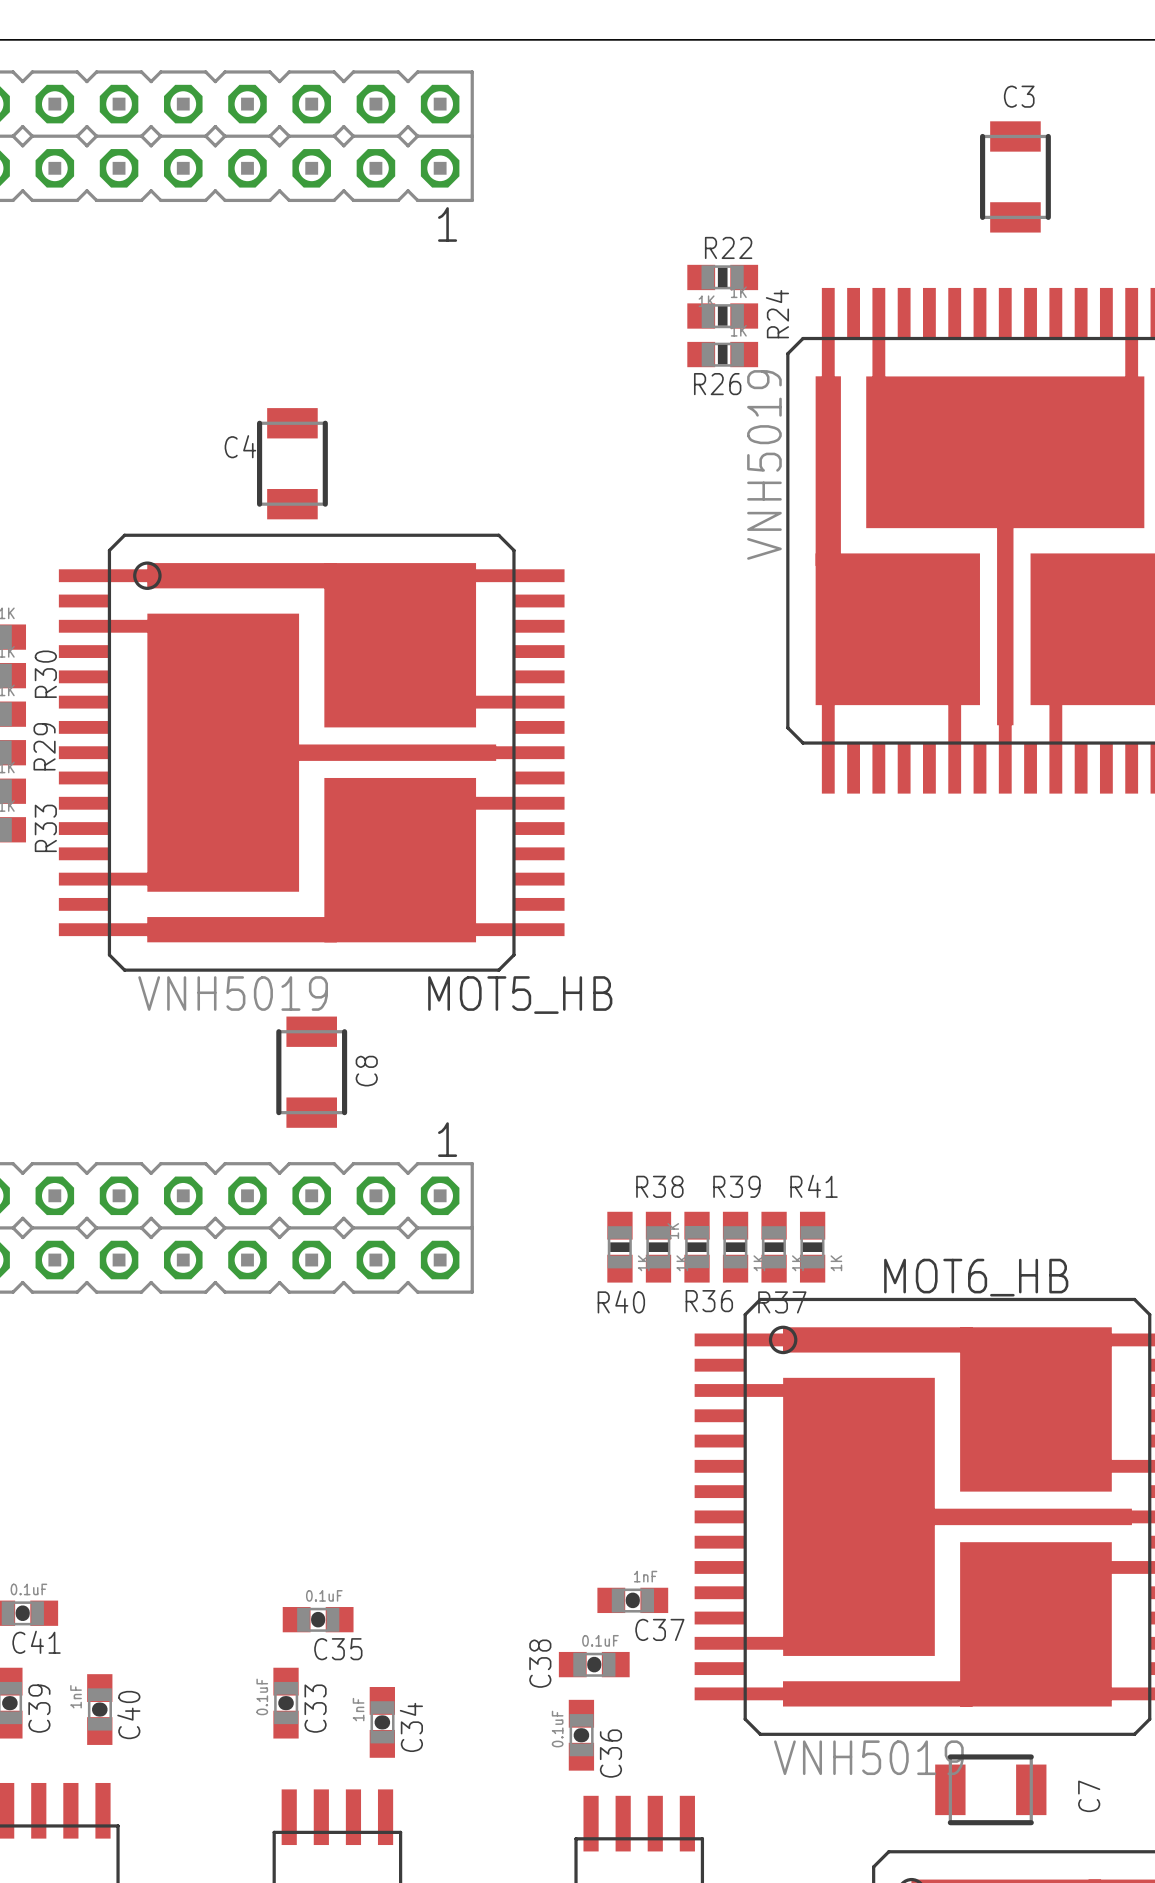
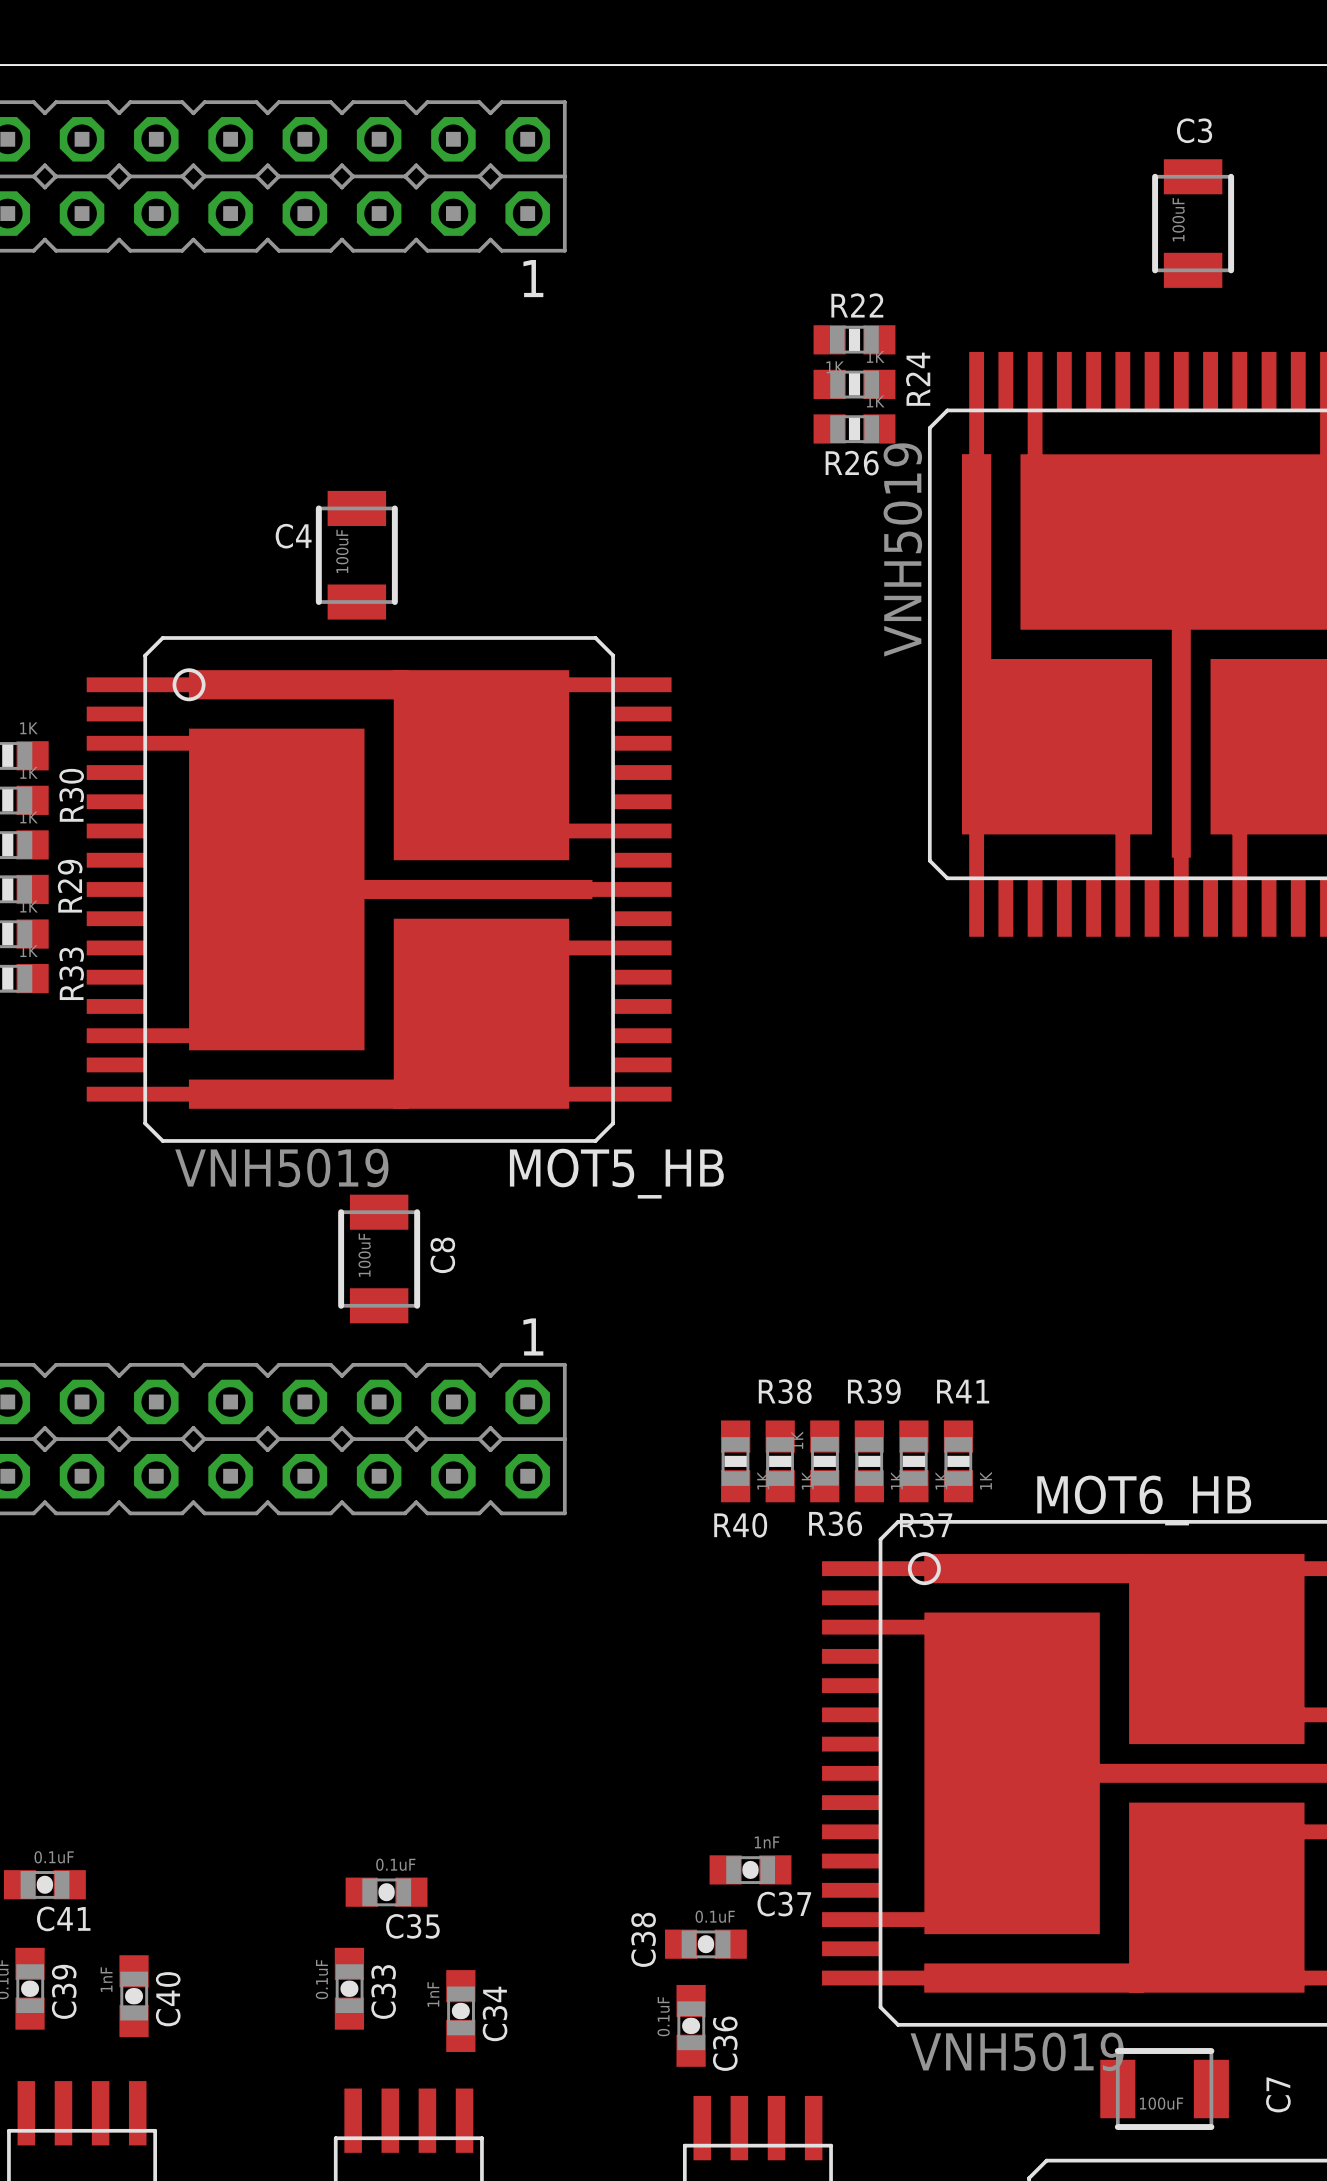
C3 value: none -> 100uF (1178, 219)
C4 value: none -> 100uF (342, 551)
C8 value: none -> 100uF (364, 1255)
C7 value: none -> 100uF (1161, 2103)

